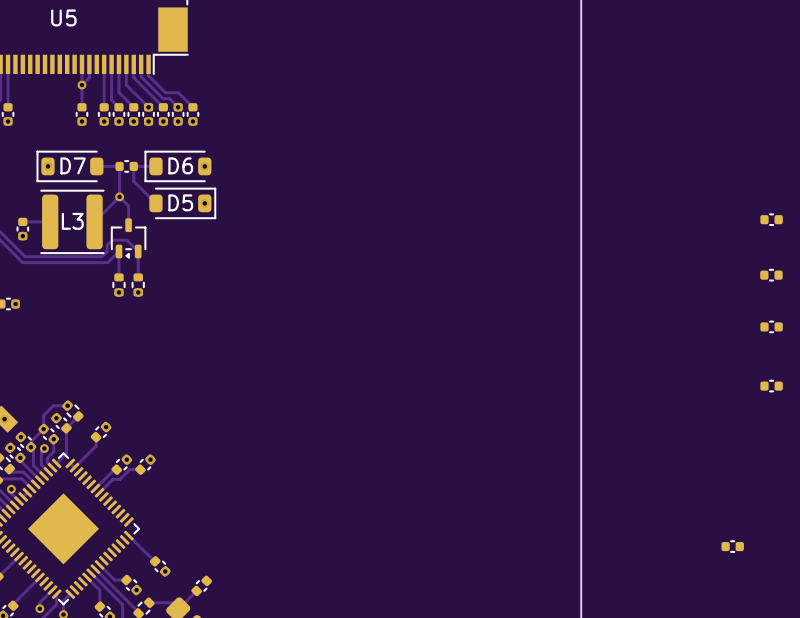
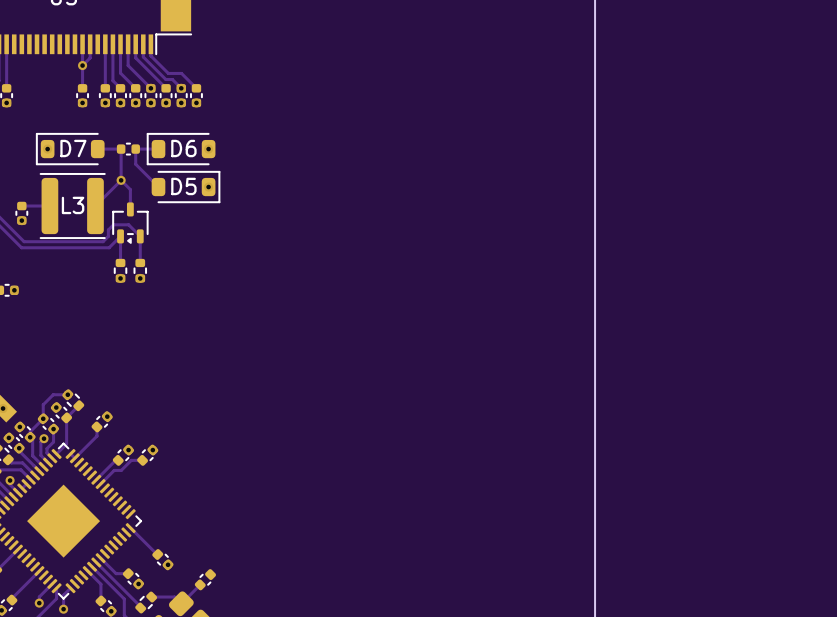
part: (771, 219) -> none
part: (771, 275) -> none
part: (771, 326) -> none
part: (771, 386) -> none
part: (732, 546) -> none

